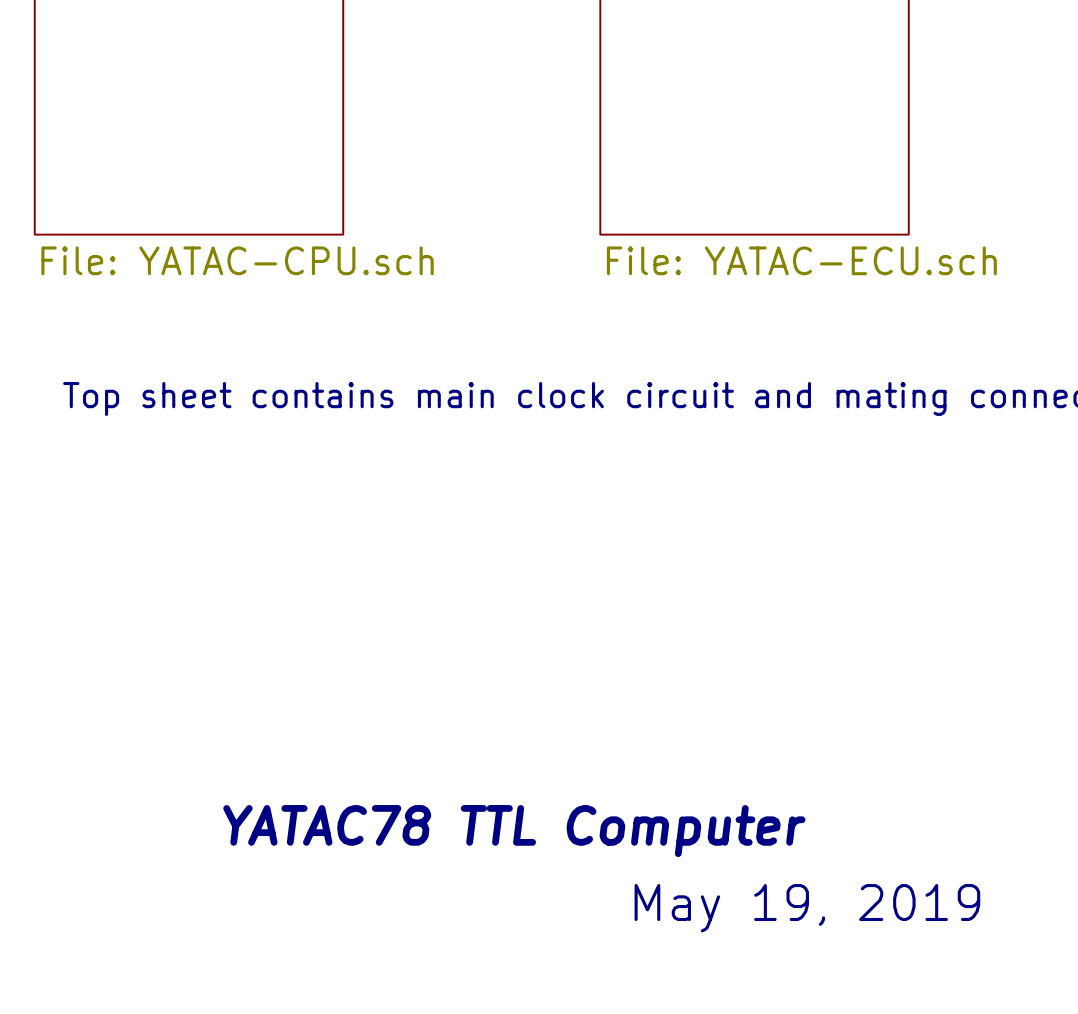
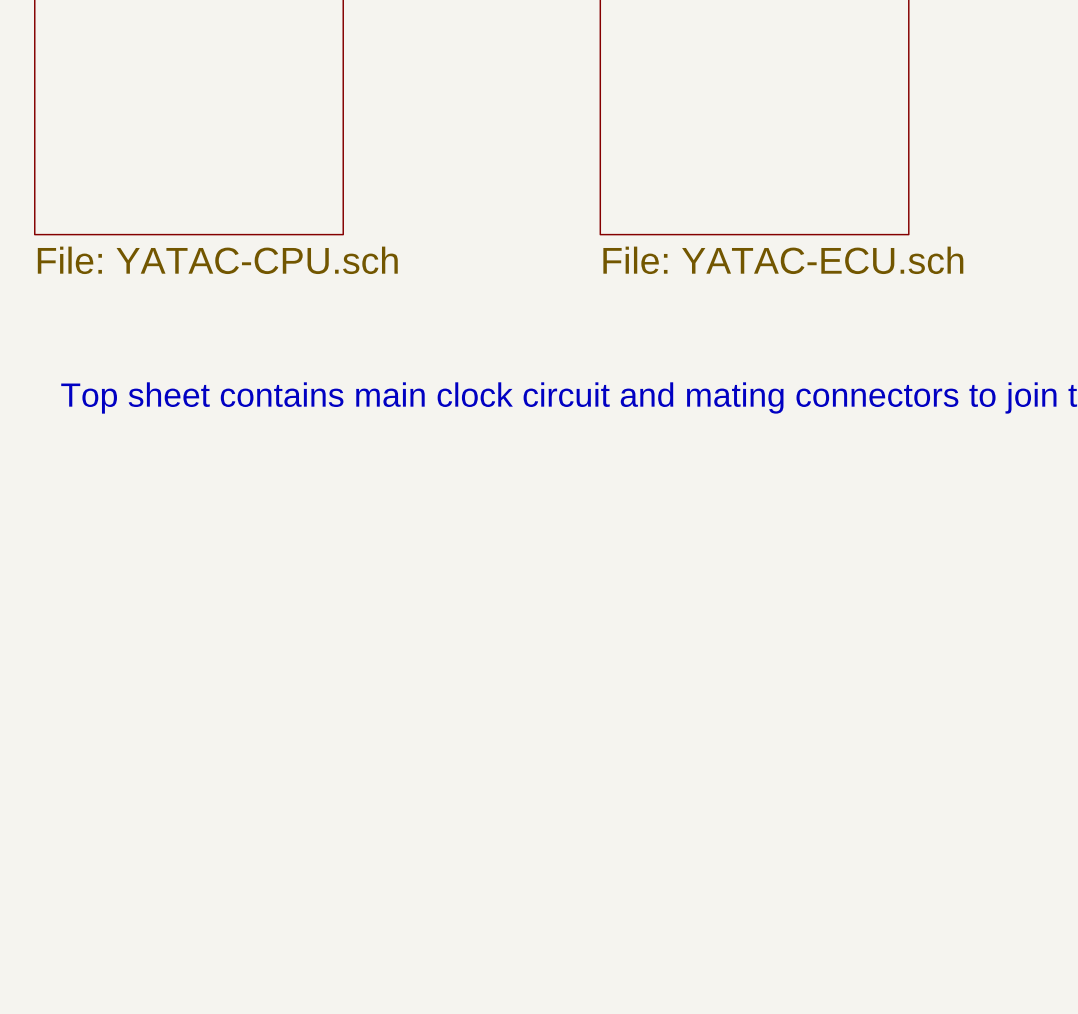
text: YATAC78 TTL Computer (514, 831) -> none
text: May 19, 2019 (807, 908) -> none

